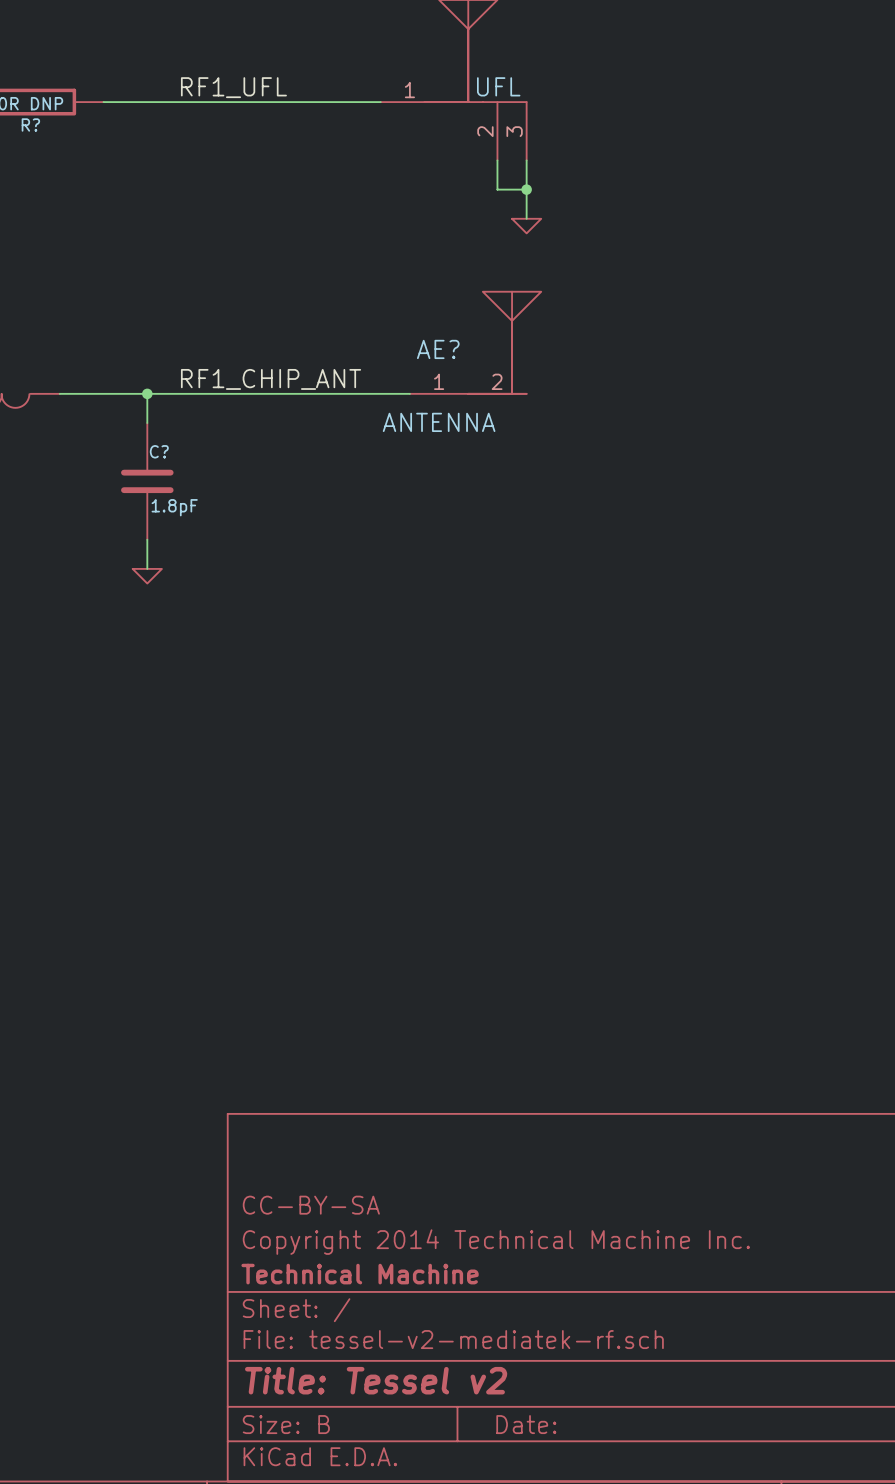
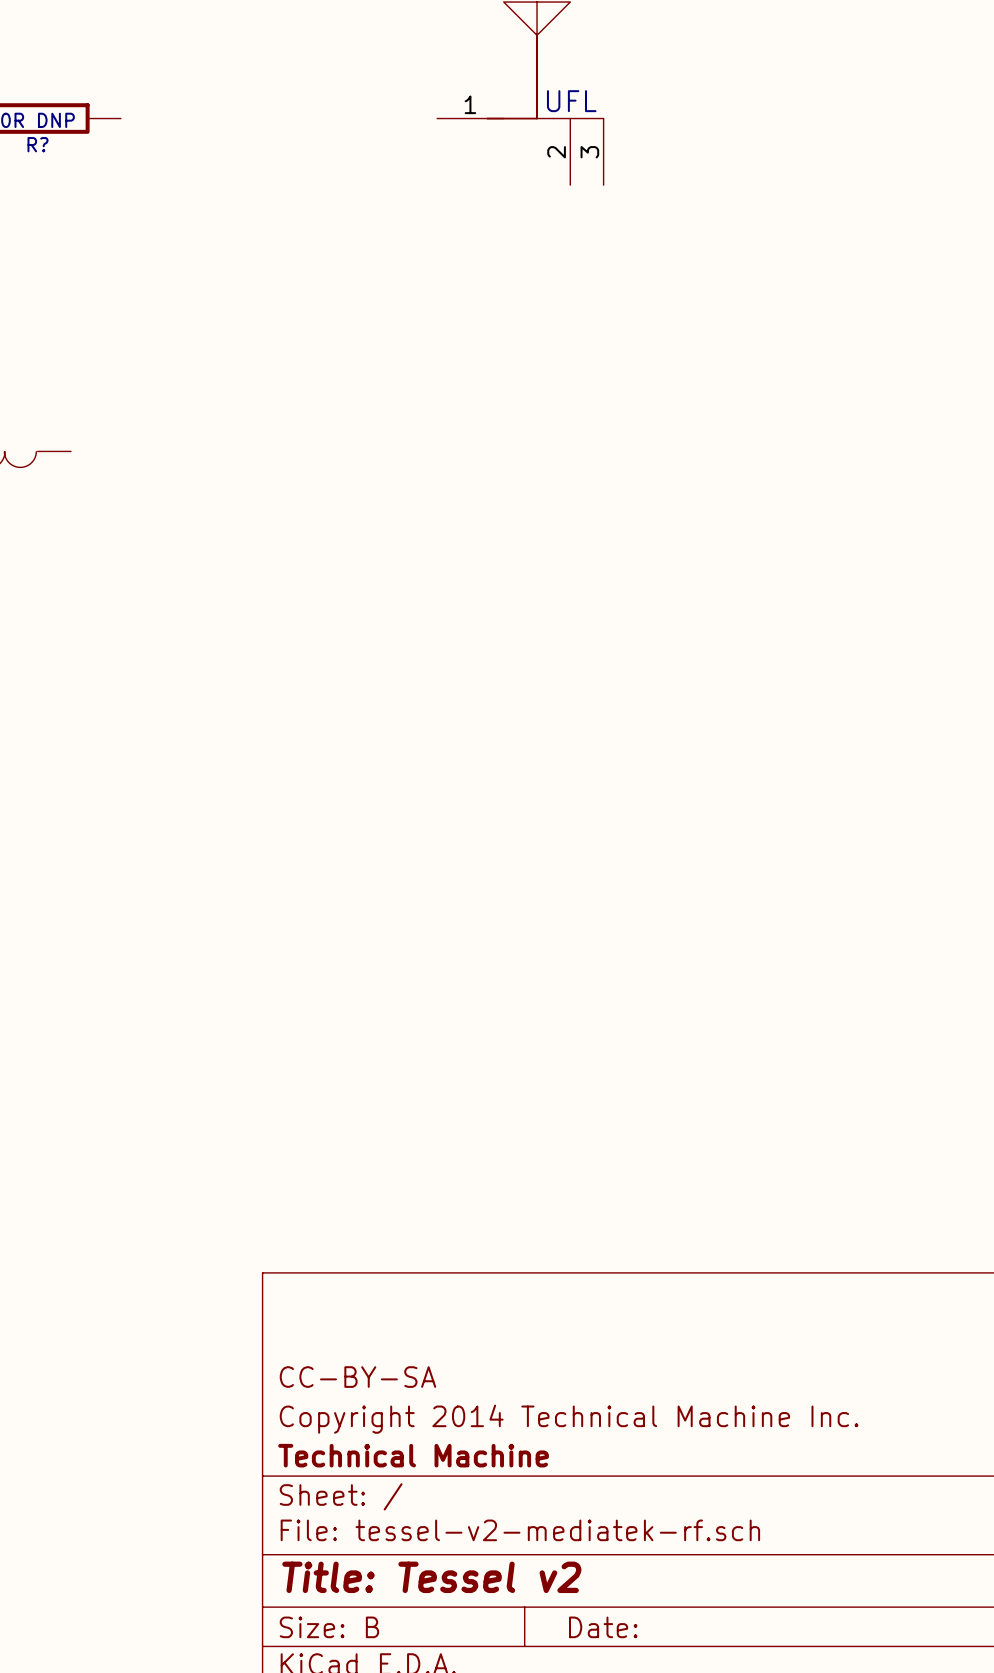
label: RF1_UFL (233, 87) -> none
wire: (103, 102) (380, 102) -> none
wire: (497, 160) (497, 189) (526, 189) -> none
wire: (526, 160) (526, 218) -> none
junction: (526, 189) -> none
power symbol: (526, 226) -> none
AE?: ANTENNA (475, 342) -> none
label: RF1_CHIP_ANT (271, 379) -> none
wire: (59, 393) (409, 393) -> none
wire: (147, 393) (147, 423) -> none
junction: (147, 393) -> none
C?: 1.8pF (147, 481) -> none
wire: (147, 539) (147, 568) -> none
power symbol: (147, 576) -> none

